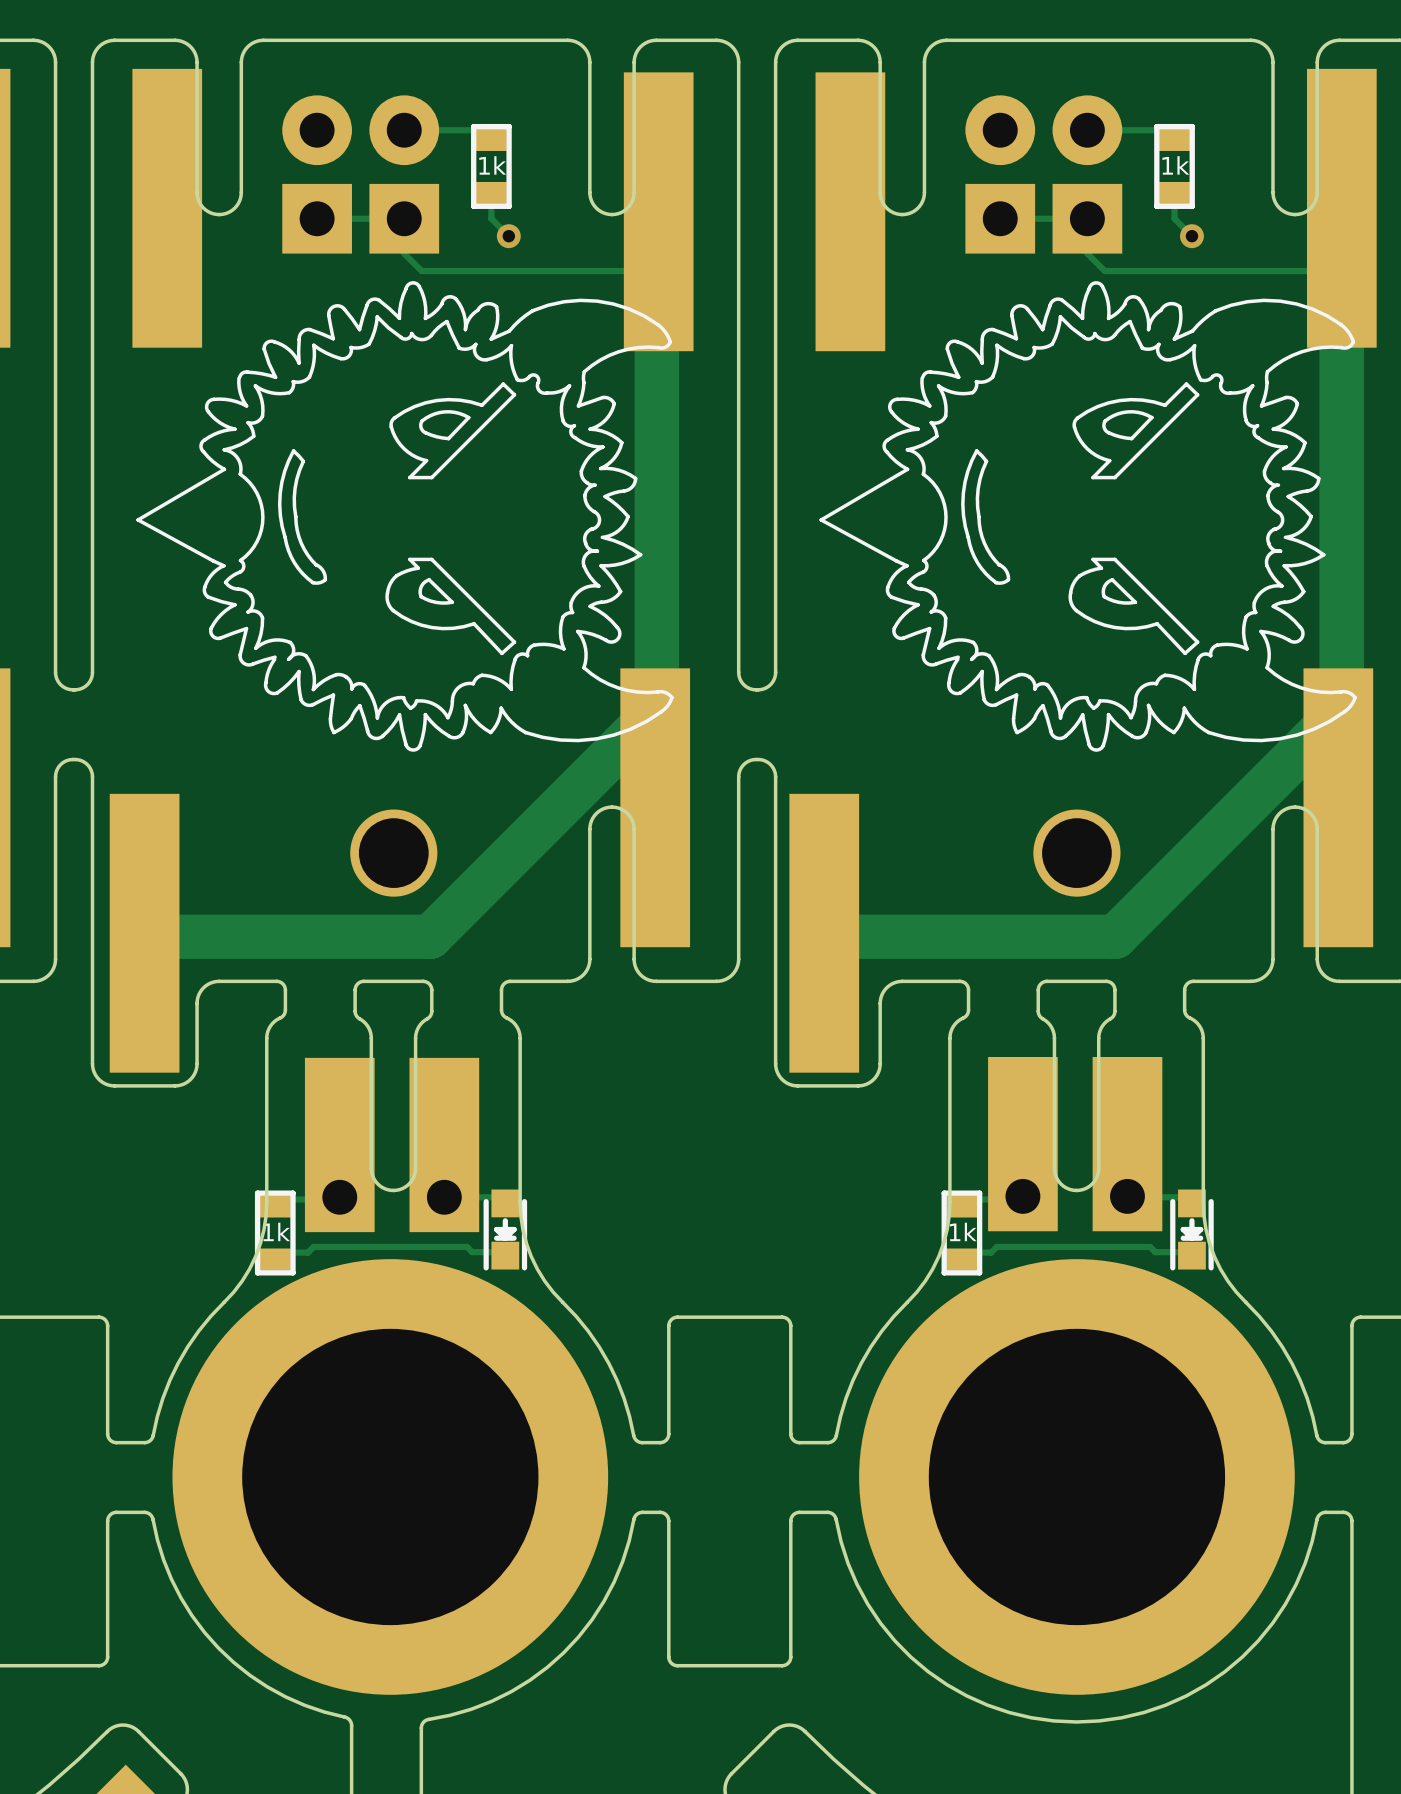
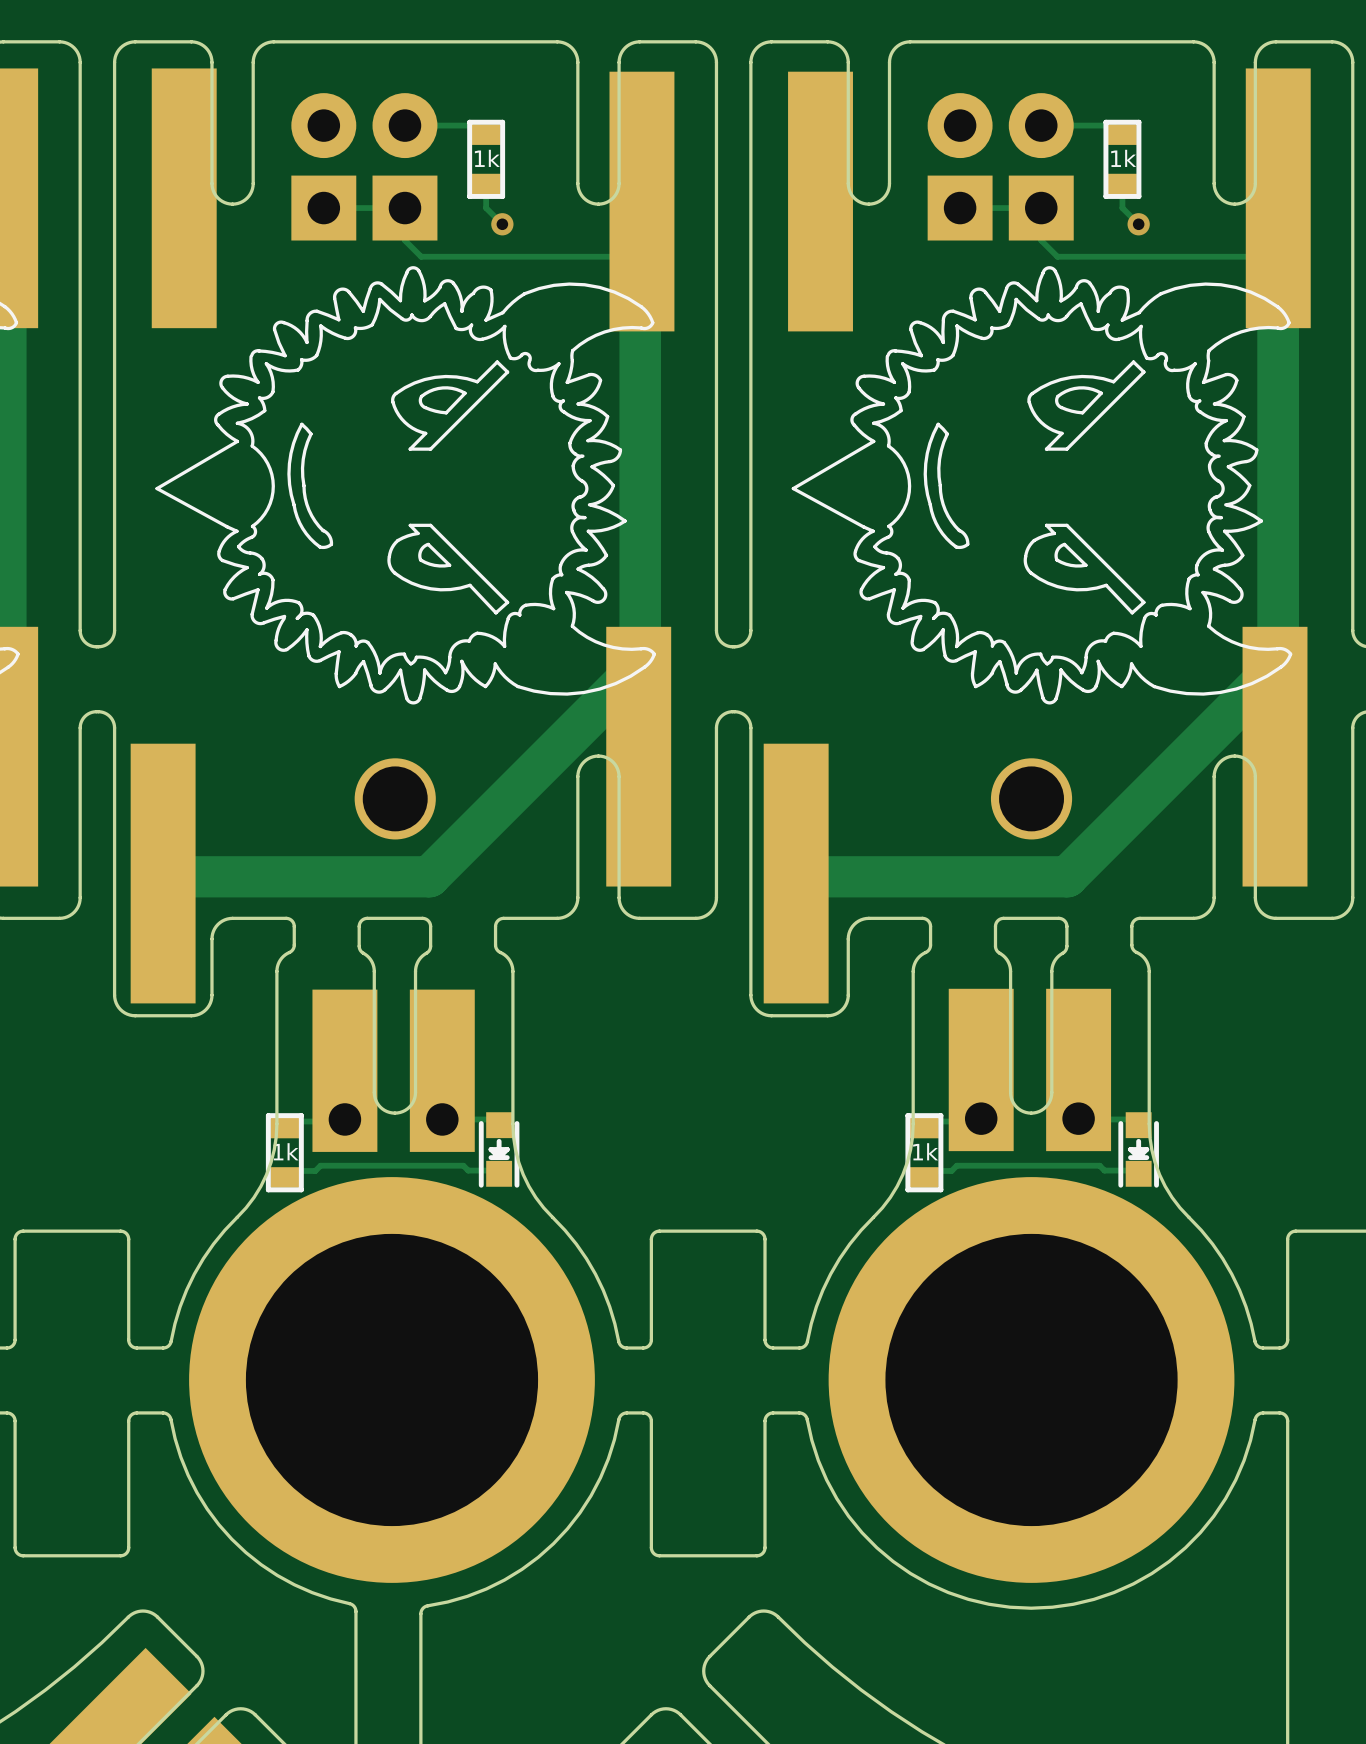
part footprint: [172, 1259, 609, 1695] -> [189, 1177, 595, 1583]
part footprint: [859, 1259, 1295, 1695] -> [828, 1177, 1235, 1583]

